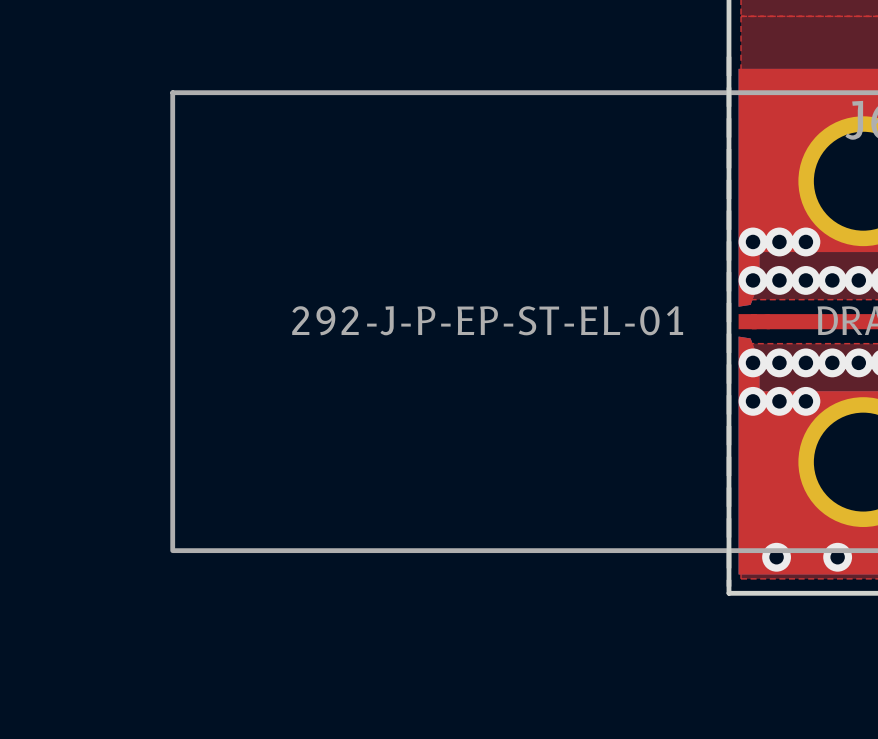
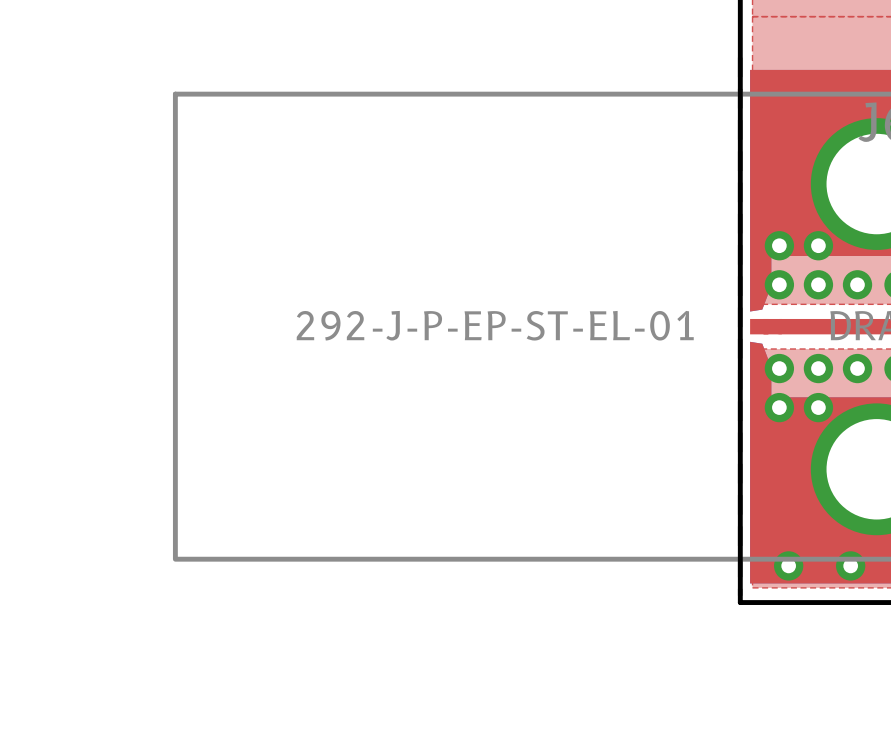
via: (753, 241) -> none
via: none -> (779, 245)
via: (779, 241) -> none
via: (753, 280) -> none
via: none -> (779, 284)
via: (779, 280) -> none
via: (832, 280) -> none
via: none -> (857, 284)
via: (858, 280) -> none
via: (753, 362) -> none
via: none -> (779, 368)
via: (779, 362) -> none
via: (832, 362) -> none
via: none -> (857, 368)
via: (858, 362) -> none
via: (753, 401) -> none
via: none -> (779, 407)
via: (779, 401) -> none

